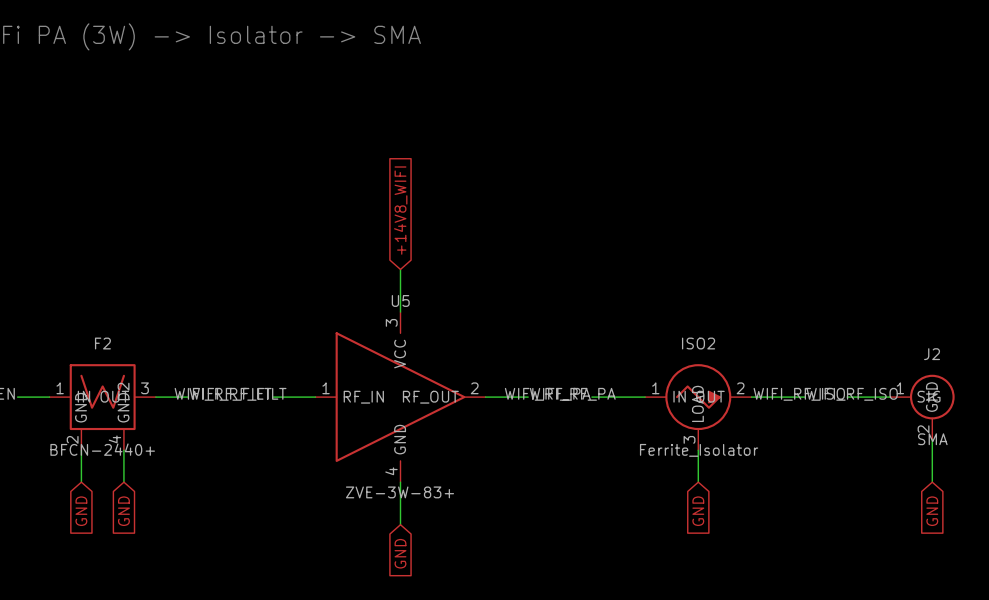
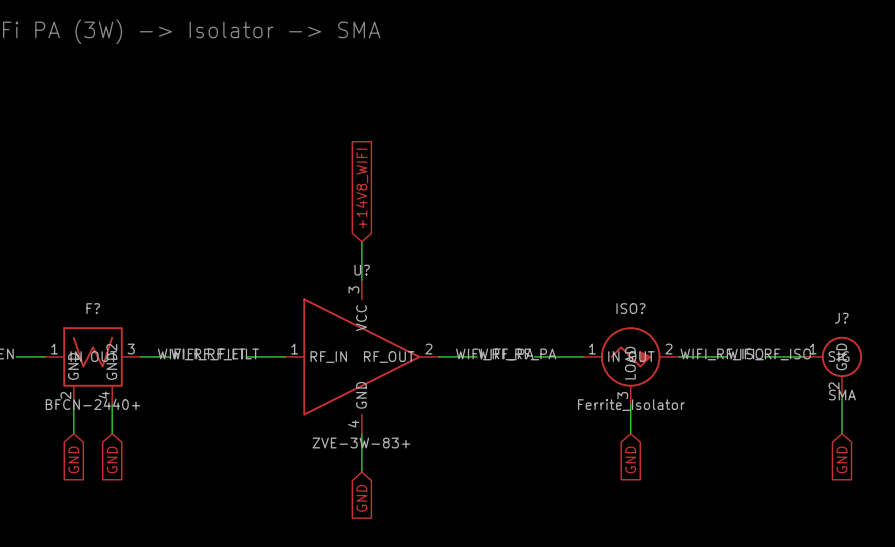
U5 name: U5 (400, 300) -> U? (362, 270)
F2 name: F2 (102, 343) -> F? (93, 308)
ISO2 name: ISO2 (698, 343) -> ISO? (630, 308)
J2 name: J2 (932, 354) -> J? (841, 318)

